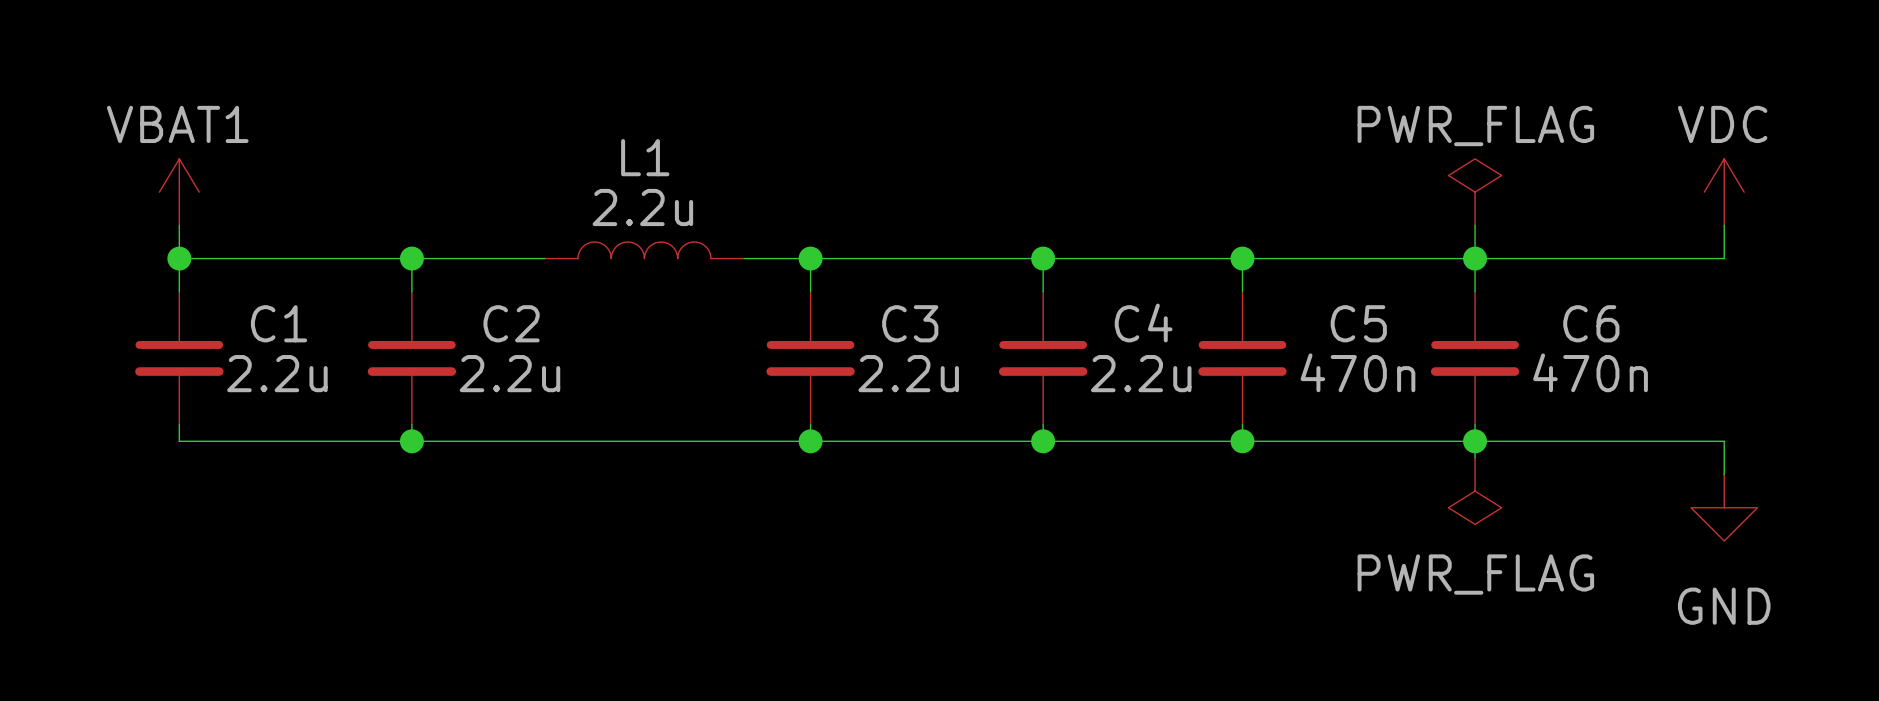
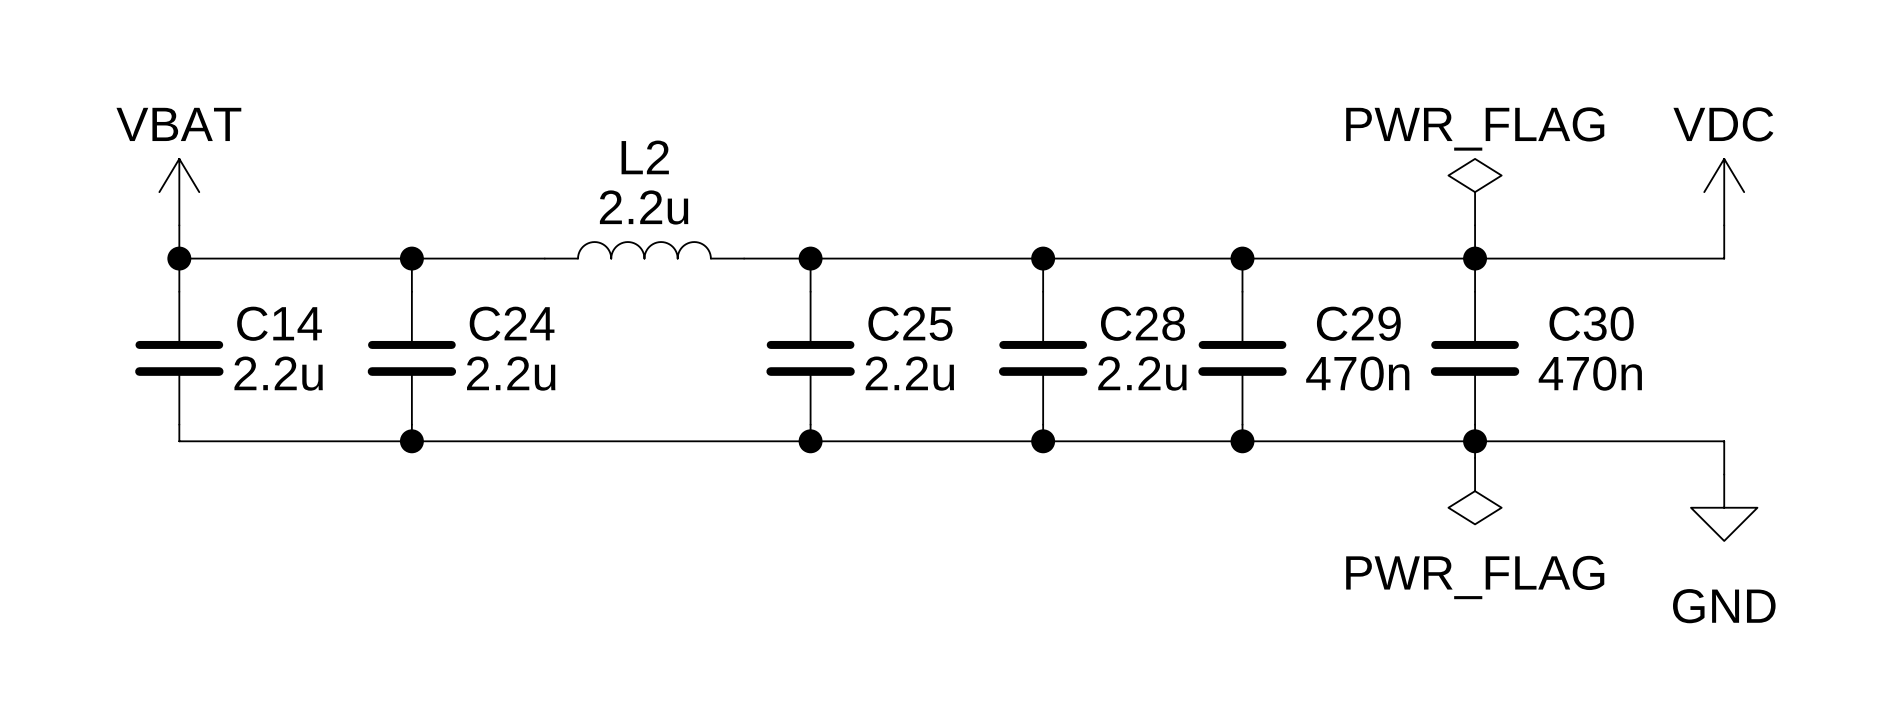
L1 name: L1 (645, 157) -> L2 (645, 157)
power symbol: VBAT1 (179, 192) -> VBAT (179, 192)
C4 name: C4 (1143, 322) -> C28 (1142, 323)
C1 name: C1 (279, 323) -> C14 (279, 323)
C2 name: C2 (511, 323) -> C24 (512, 323)
C3 name: C3 (910, 323) -> C25 (910, 323)
C5 name: C5 (1358, 323) -> C29 (1358, 323)
C6 name: C6 (1591, 323) -> C30 (1591, 323)

